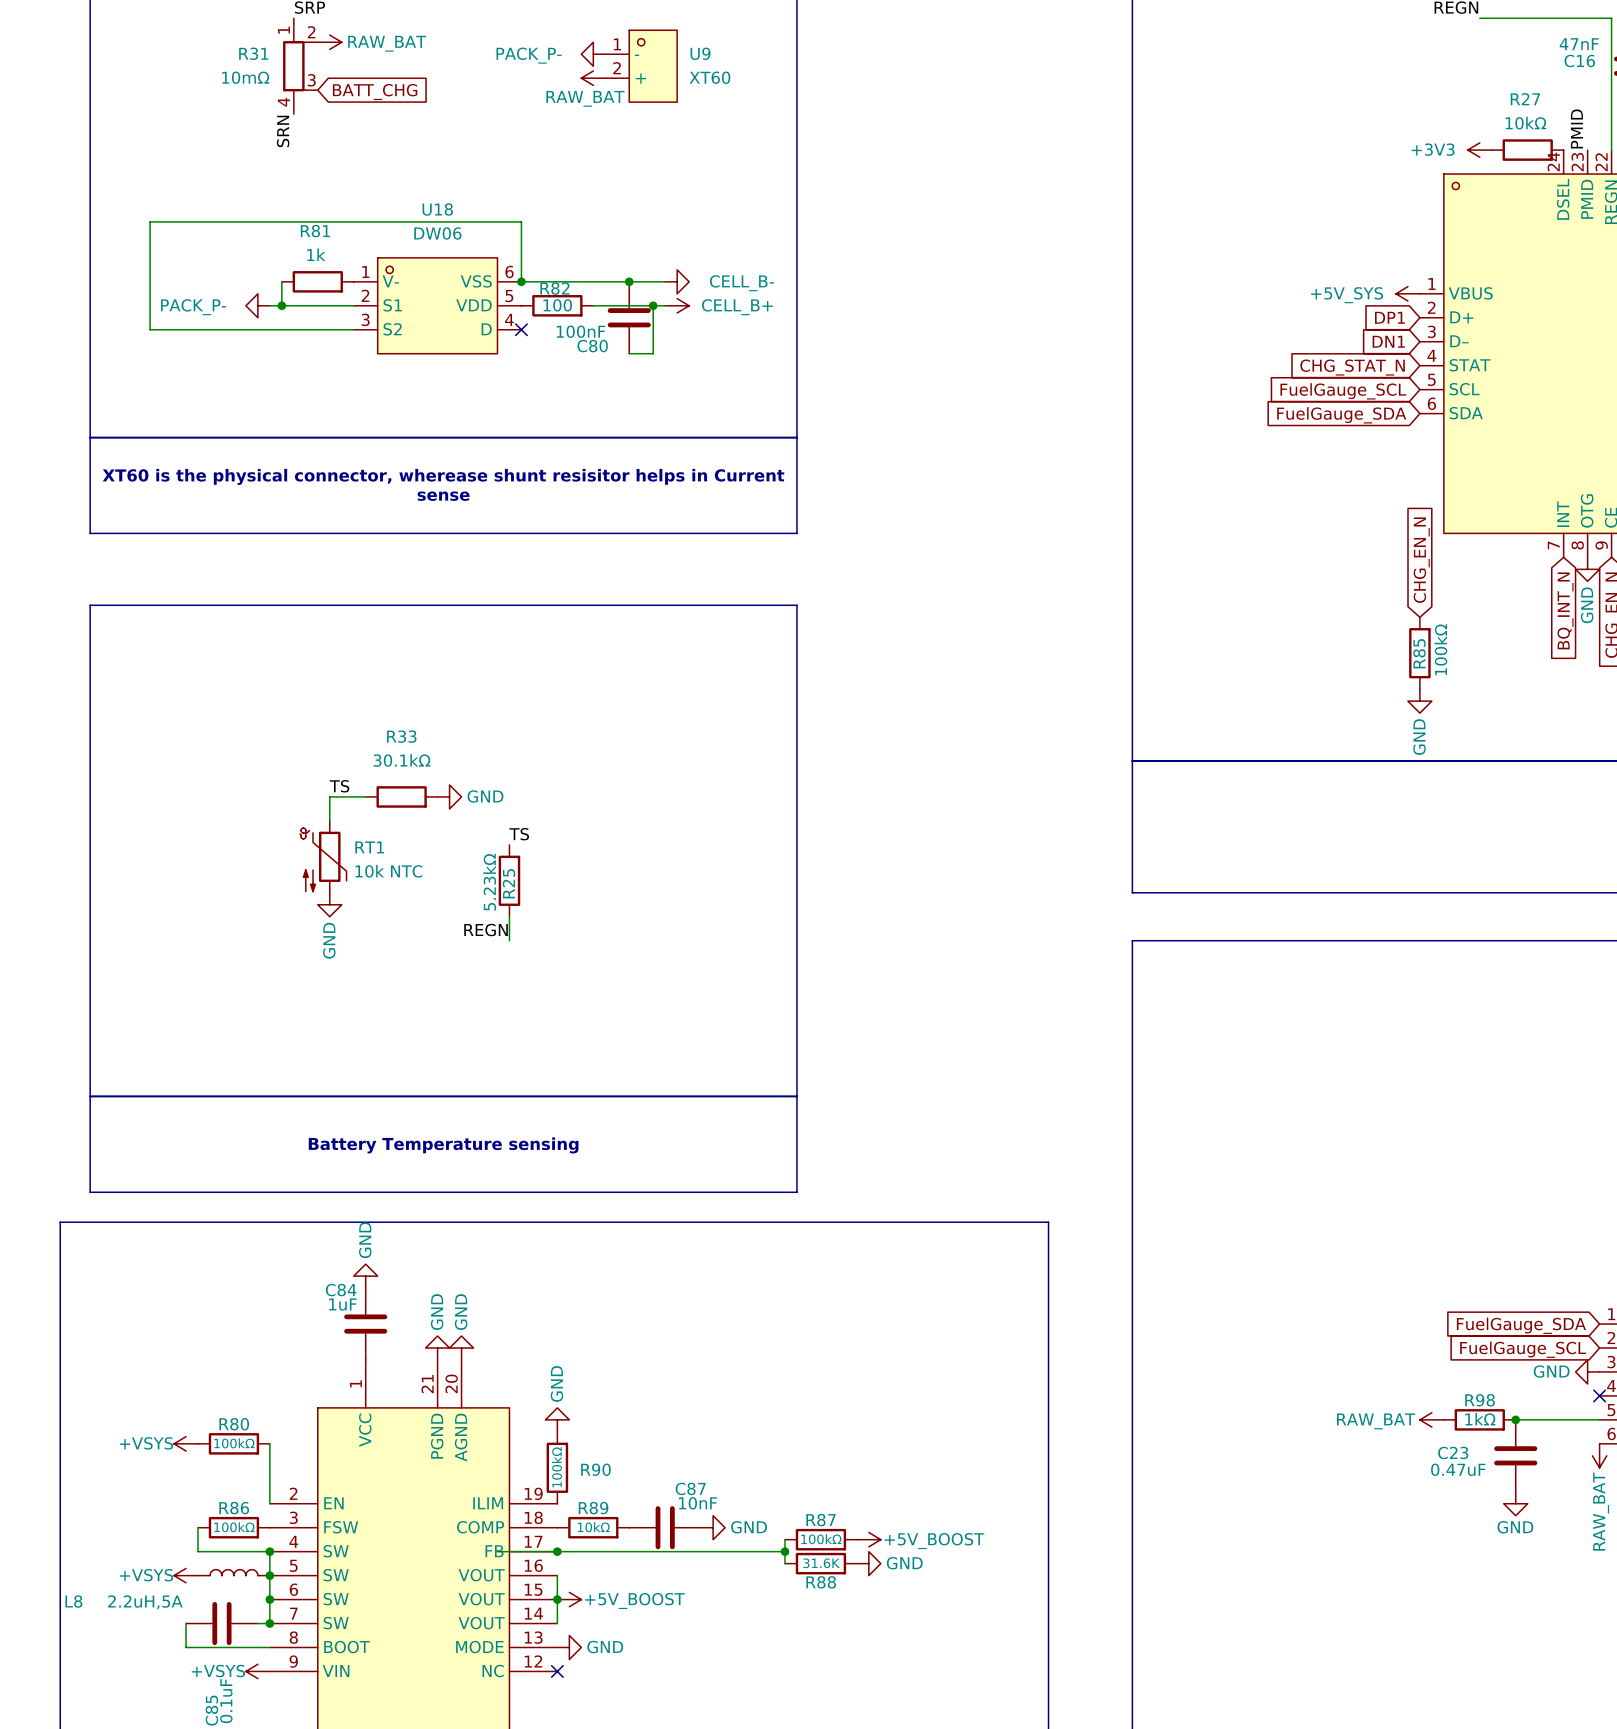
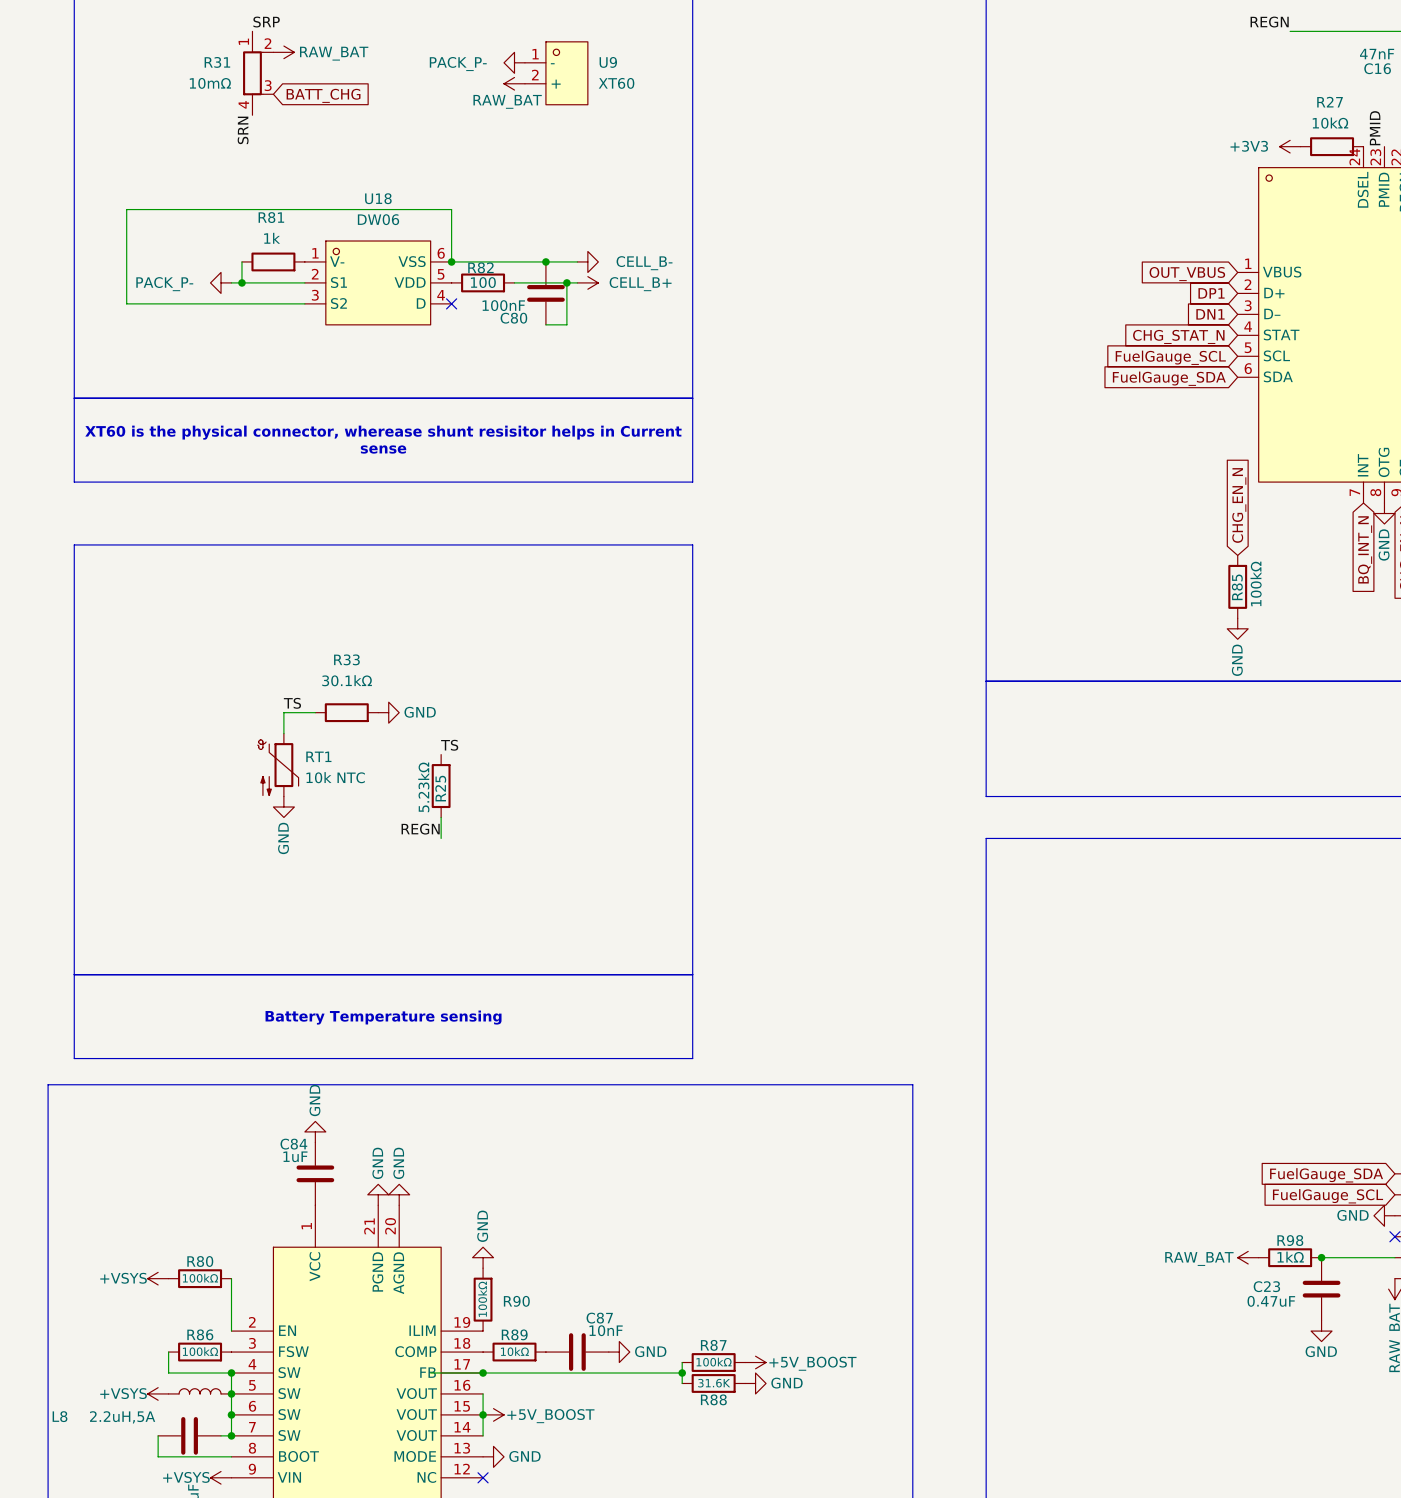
power symbol: +5V_SYS (1407, 293) -> none
global label: none -> OUT_VBUS (1187, 274)

